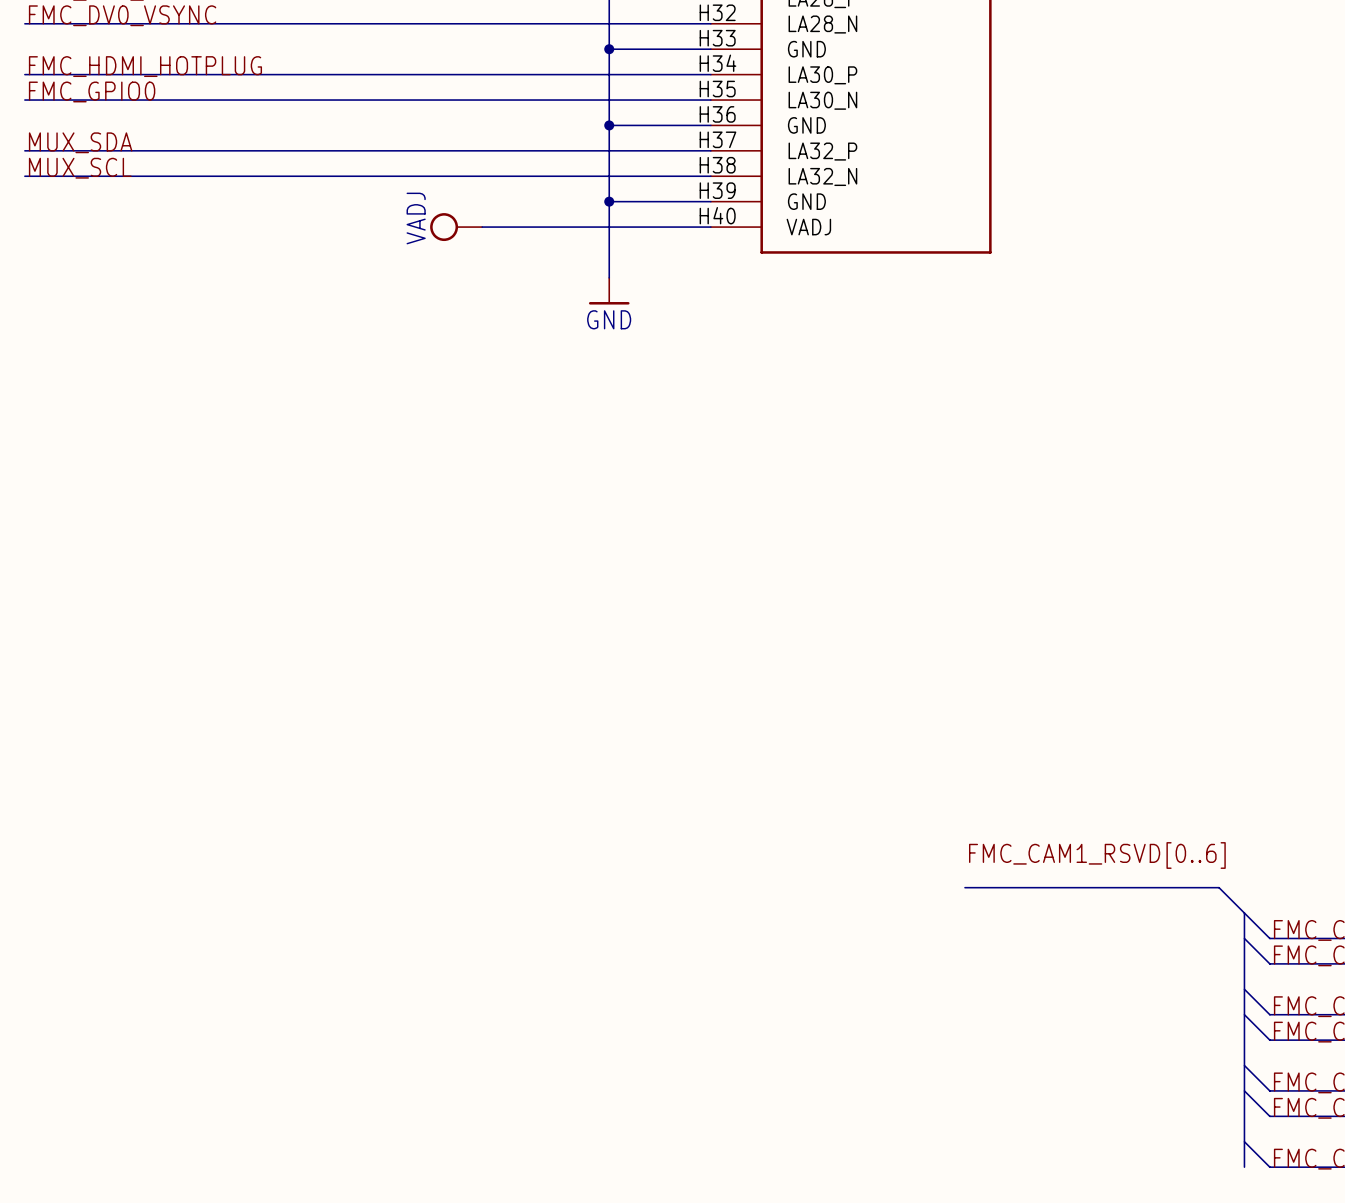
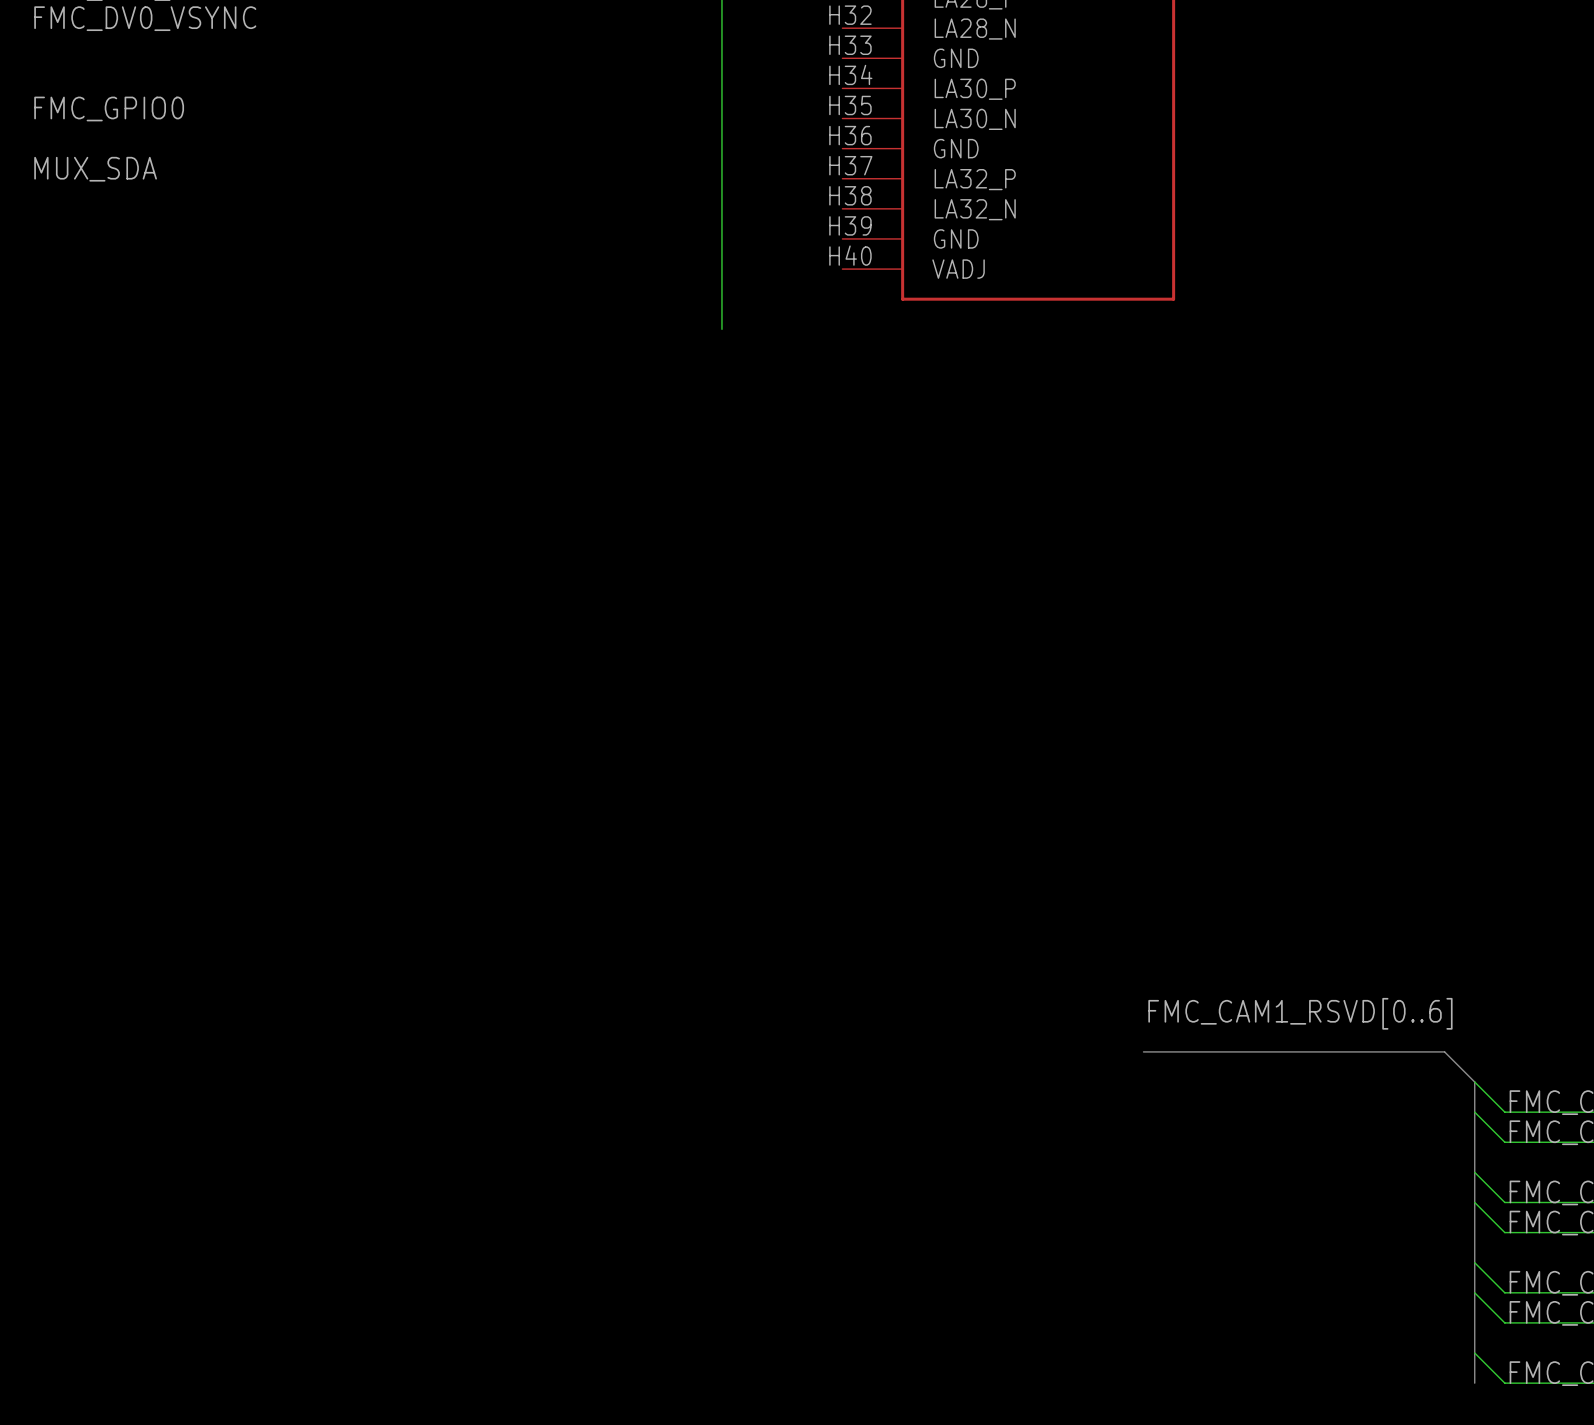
wire: (24, 23) (710, 23) -> none
wire: (609, 49) (710, 49) -> none
junction: (609, 49) -> none
label: FMC_HDMI_HOTPLUG (145, 66) -> none
wire: (24, 74) (710, 74) -> none
wire: (24, 100) (710, 100) -> none
wire: (609, 125) (710, 125) -> none
junction: (609, 125) -> none
wire: (24, 150) (710, 150) -> none
label: MUX_SCL (80, 168) -> none
wire: (24, 176) (710, 176) -> none
wire: (609, 201) (710, 201) -> none
junction: (609, 201) -> none
power symbol: VADJ (456, 227) -> none
wire: (482, 227) (710, 227) -> none
power symbol: GND (609, 291) -> none

